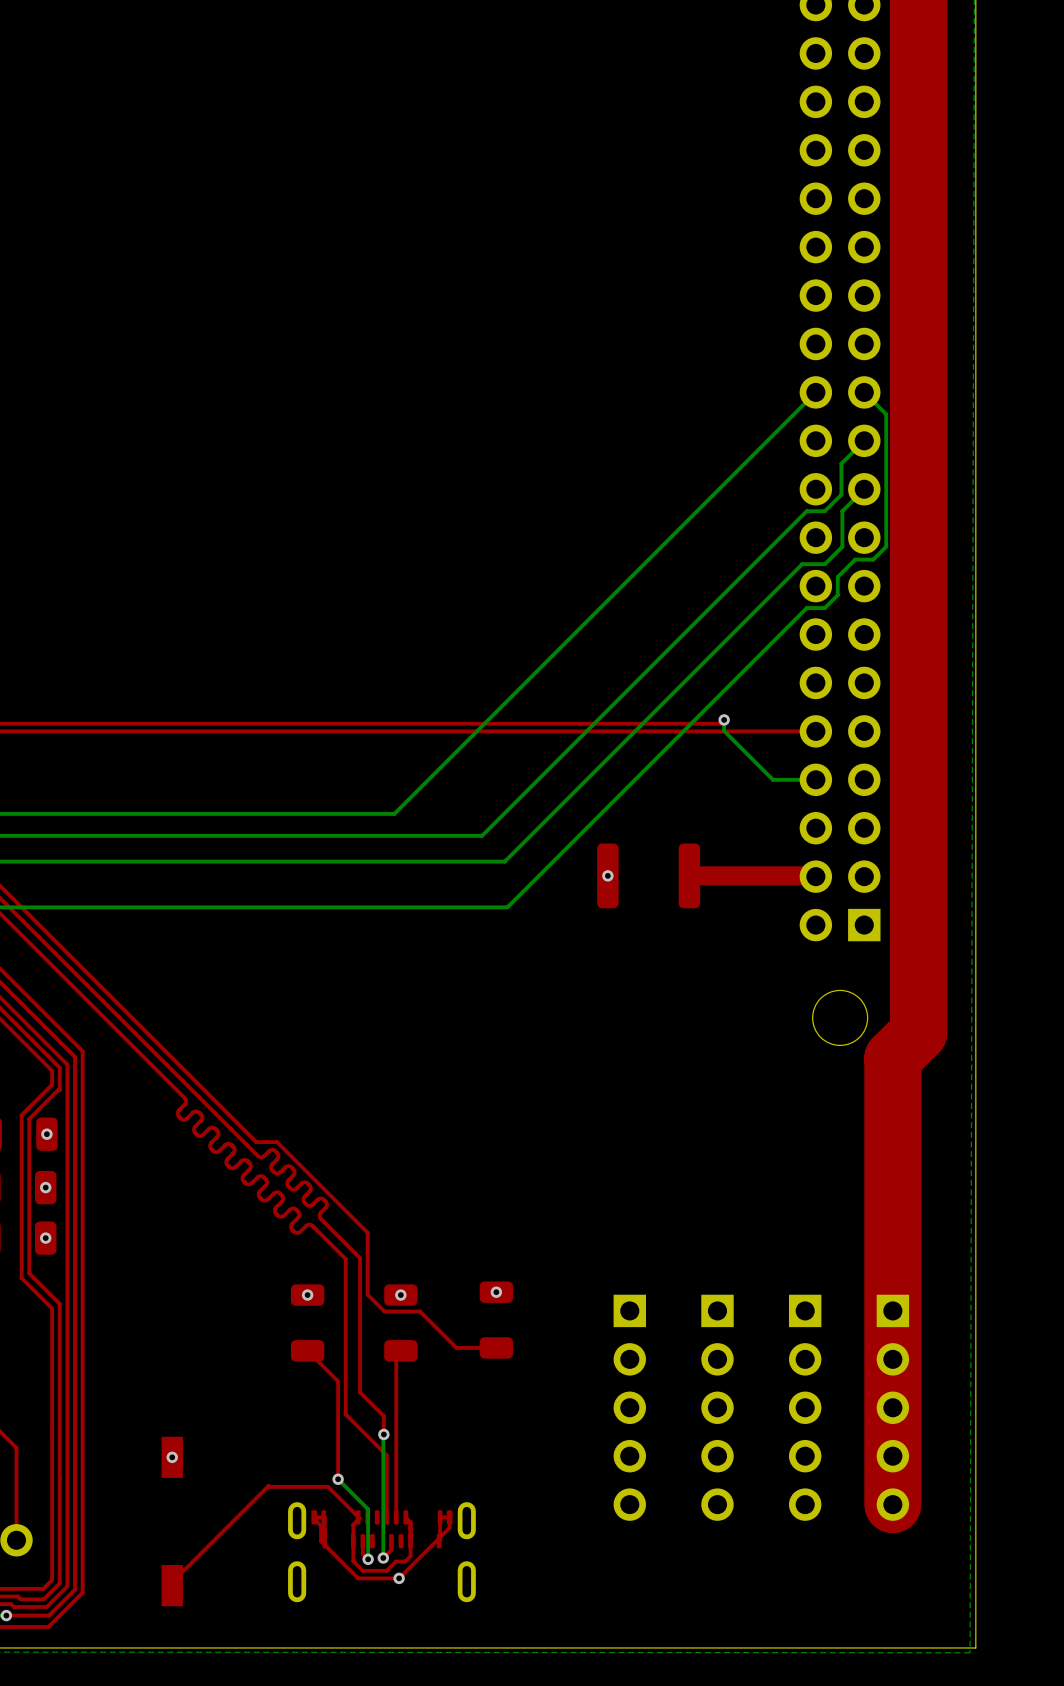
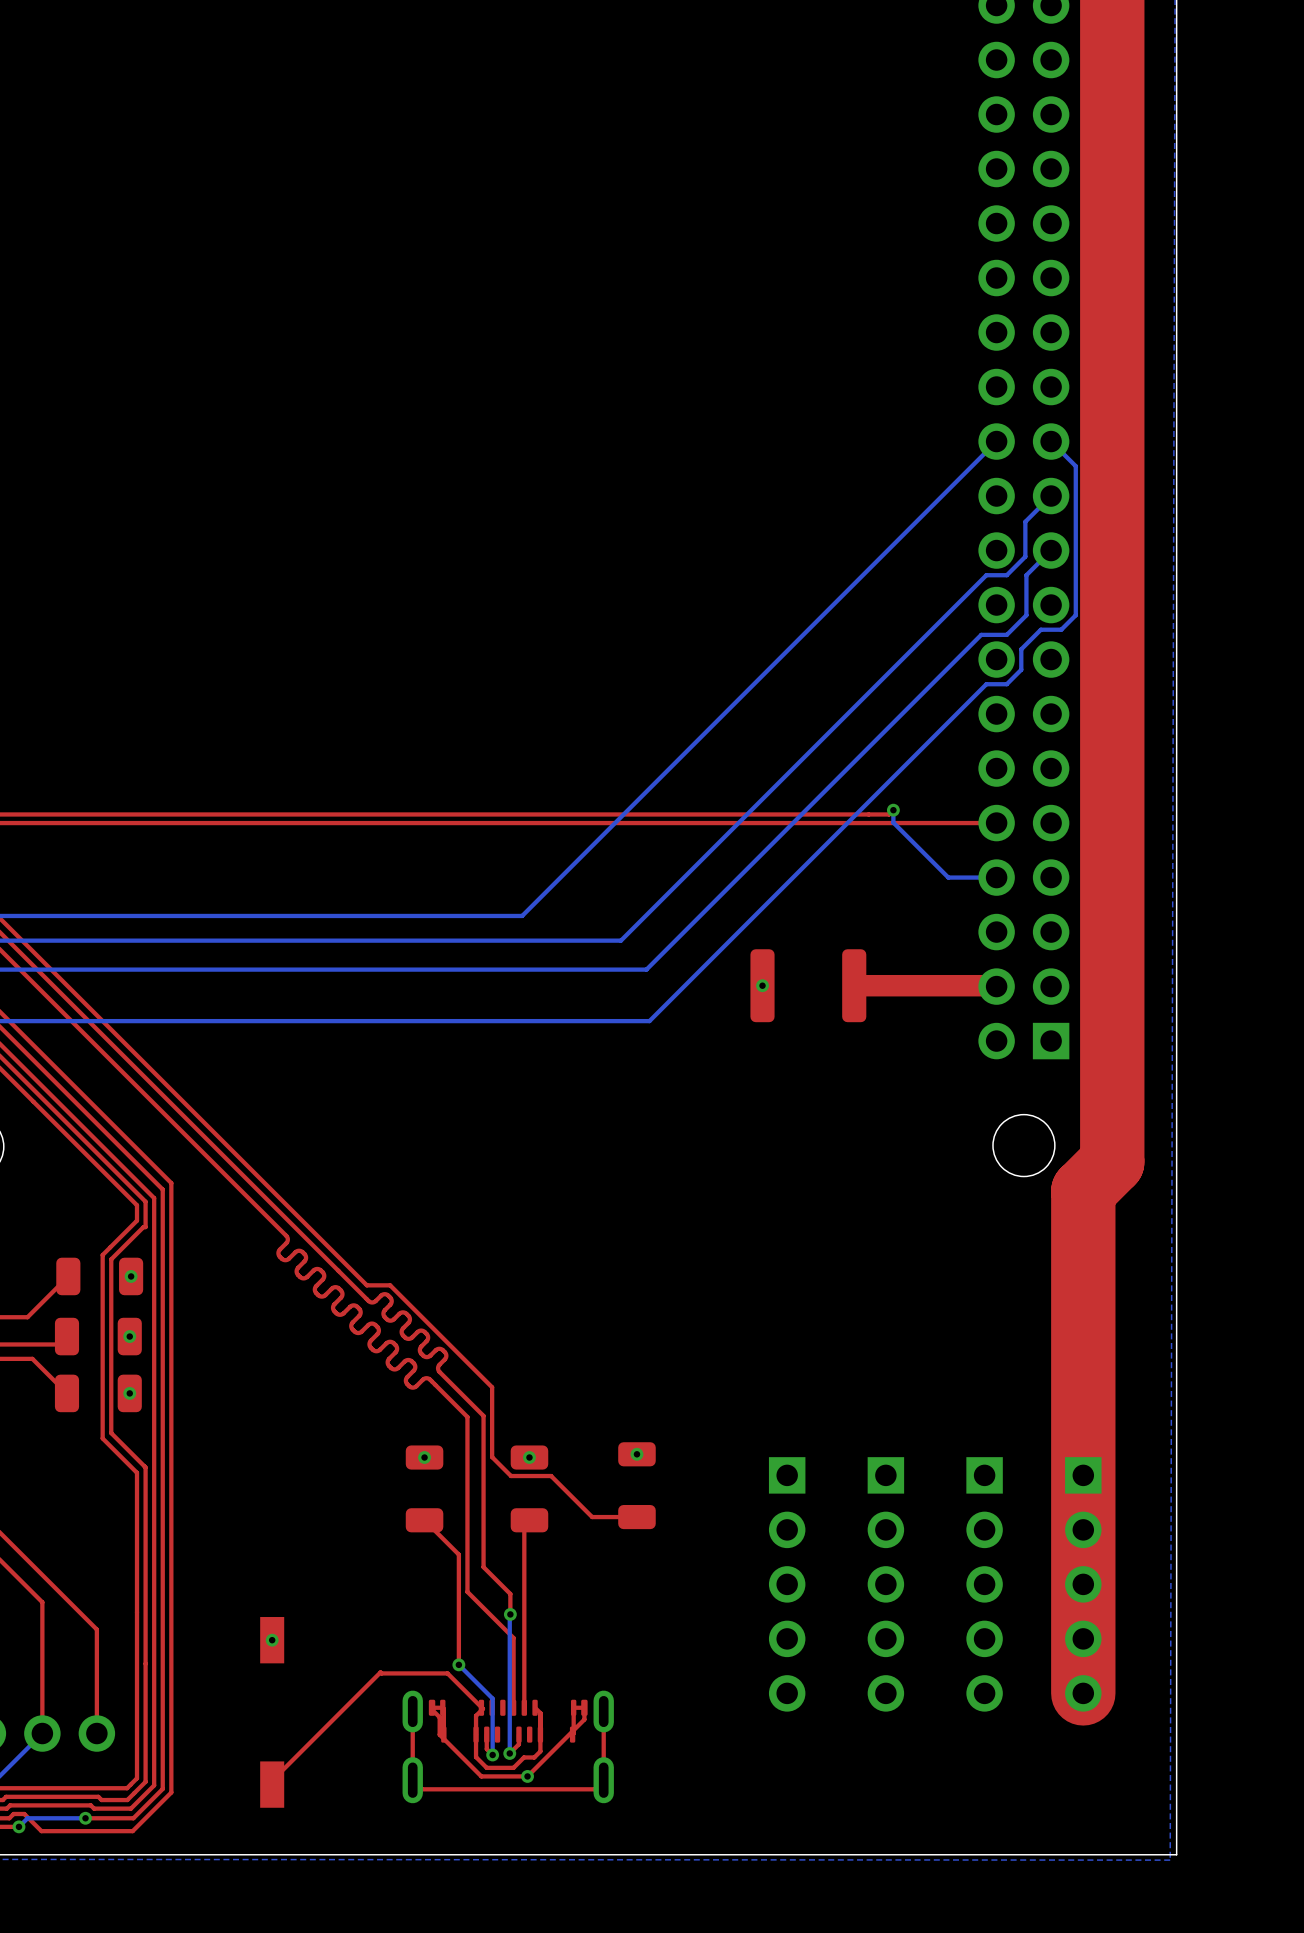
top track: none -> (603, 1711) (603, 1780) (594, 1789) (421, 1789) (412, 1780) (412, 1711)

